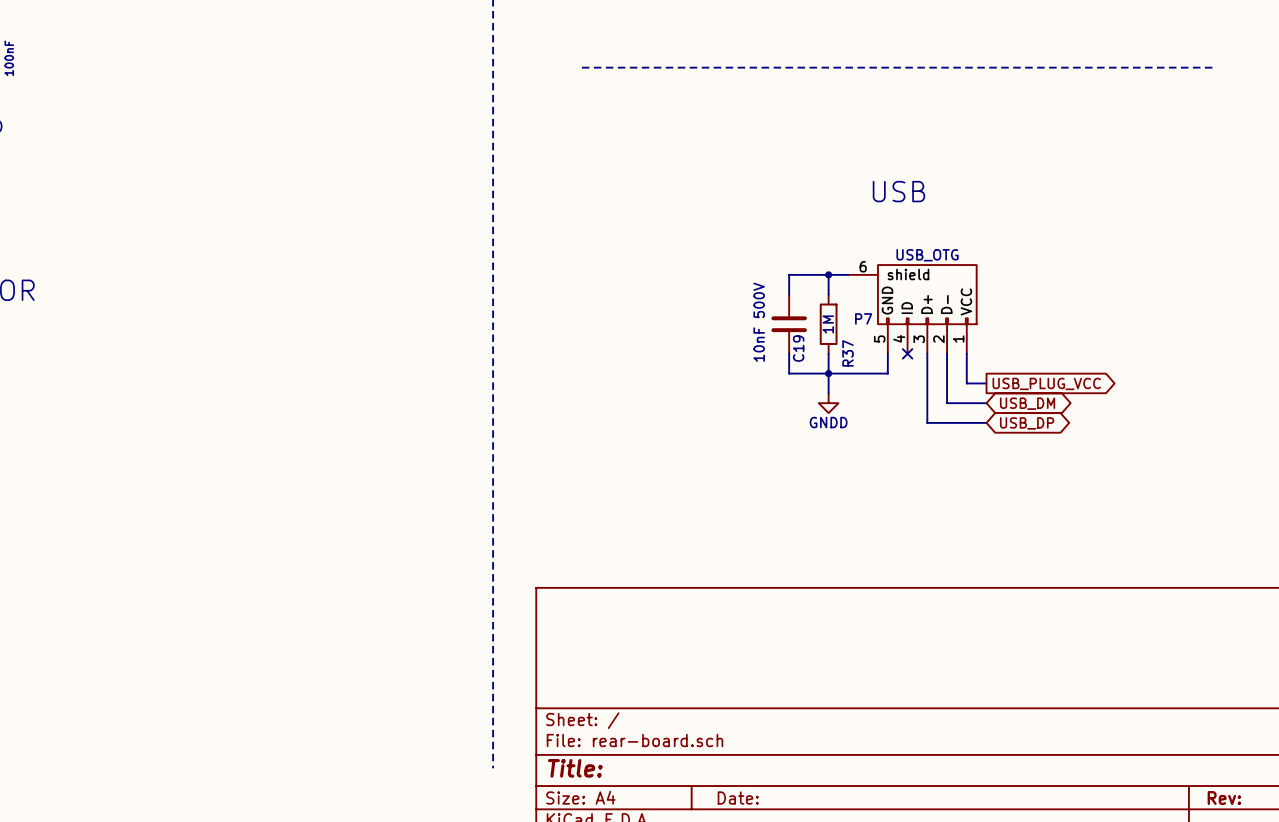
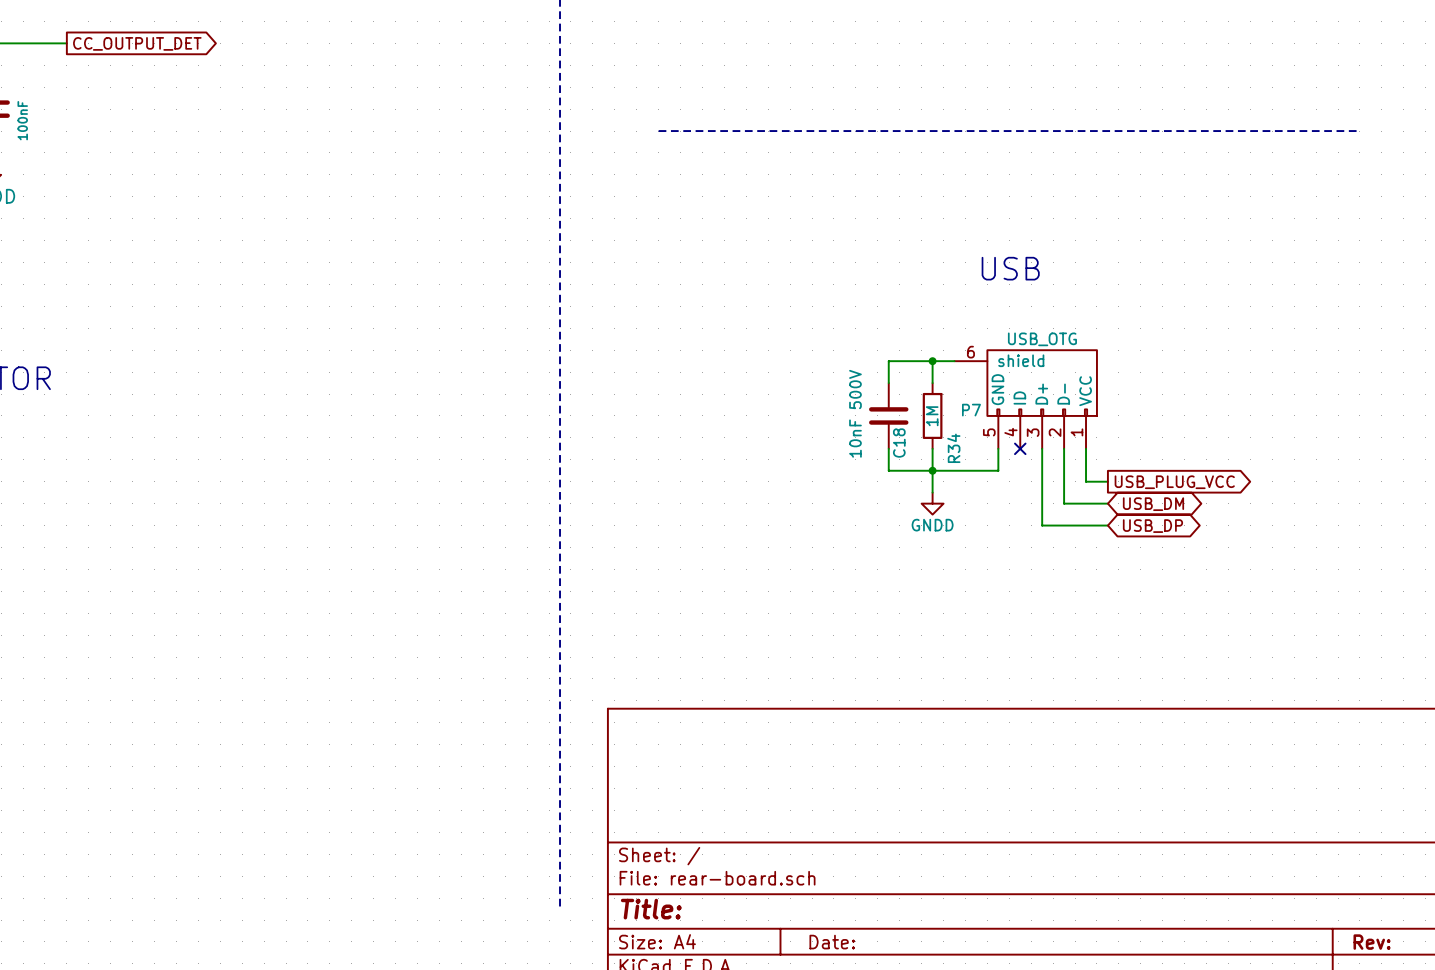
C19 name: C19 (798, 348) -> C18 (899, 443)
R37 name: R37 (848, 353) -> R34 (953, 448)

